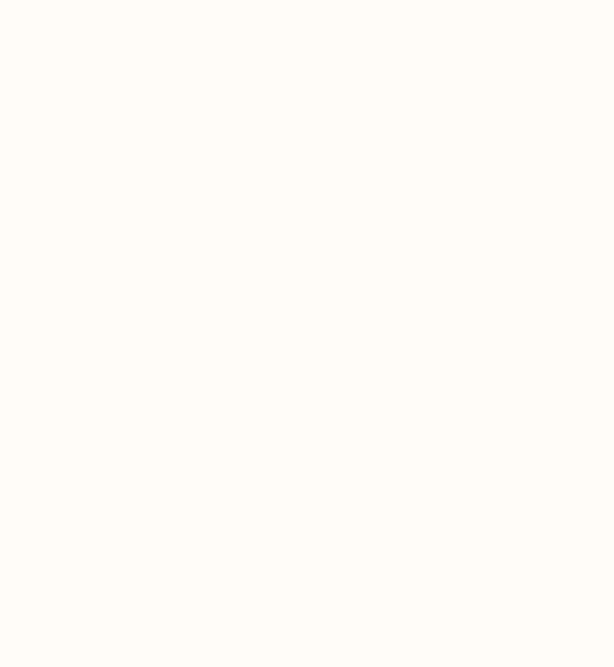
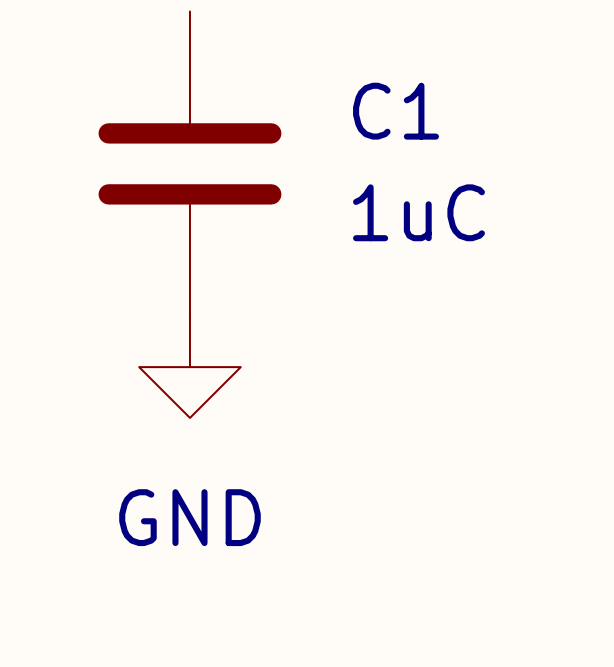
C1: none -> 1uC (189, 163)
power symbol: none -> GND (189, 367)

